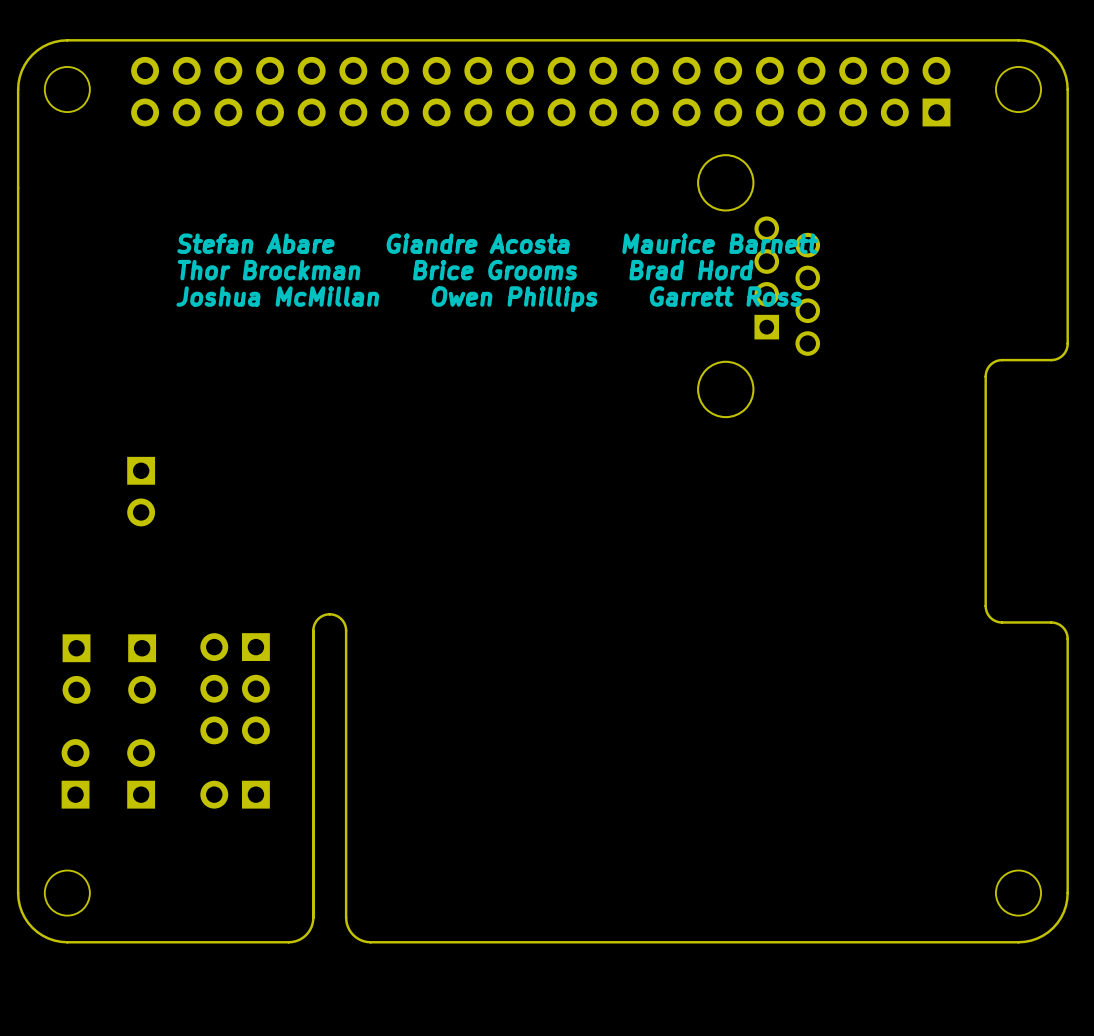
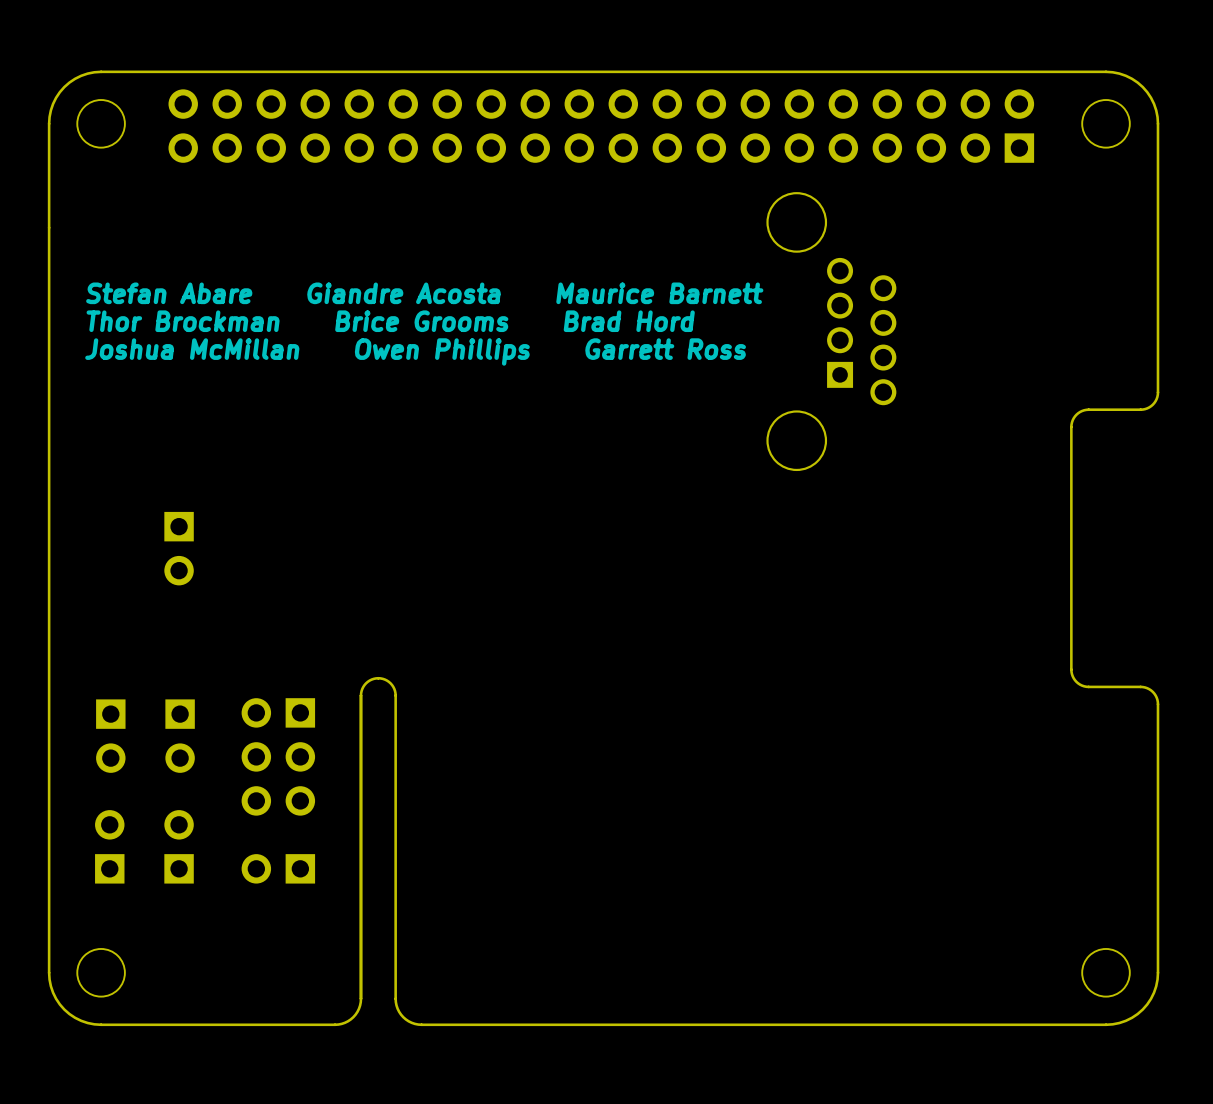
text position: Stefan Abare Giandre Acosta Maurice Barnett (497, 243) -> Stefan Abare Giandre Acosta Maurice Barnett (424, 293)
text position: Thor Brockman Brice Grooms Brad Hord (465, 270) -> Thor Brockman Brice Grooms Brad Hord (390, 321)
text position: Joshua McMillan Owen Phillips Garrett Ross (489, 299) -> Joshua McMillan Owen Phillips Garrett Ross (415, 351)

